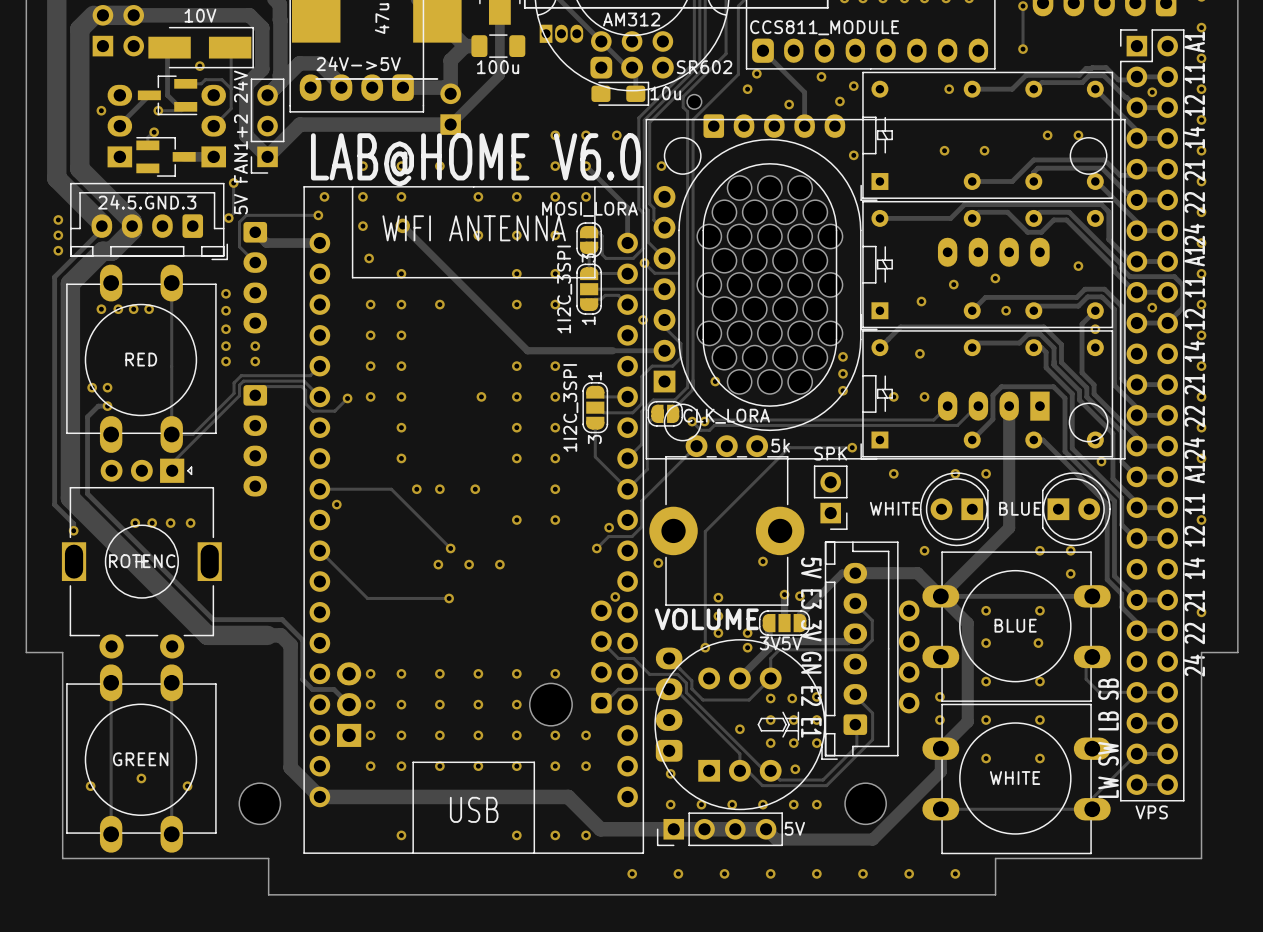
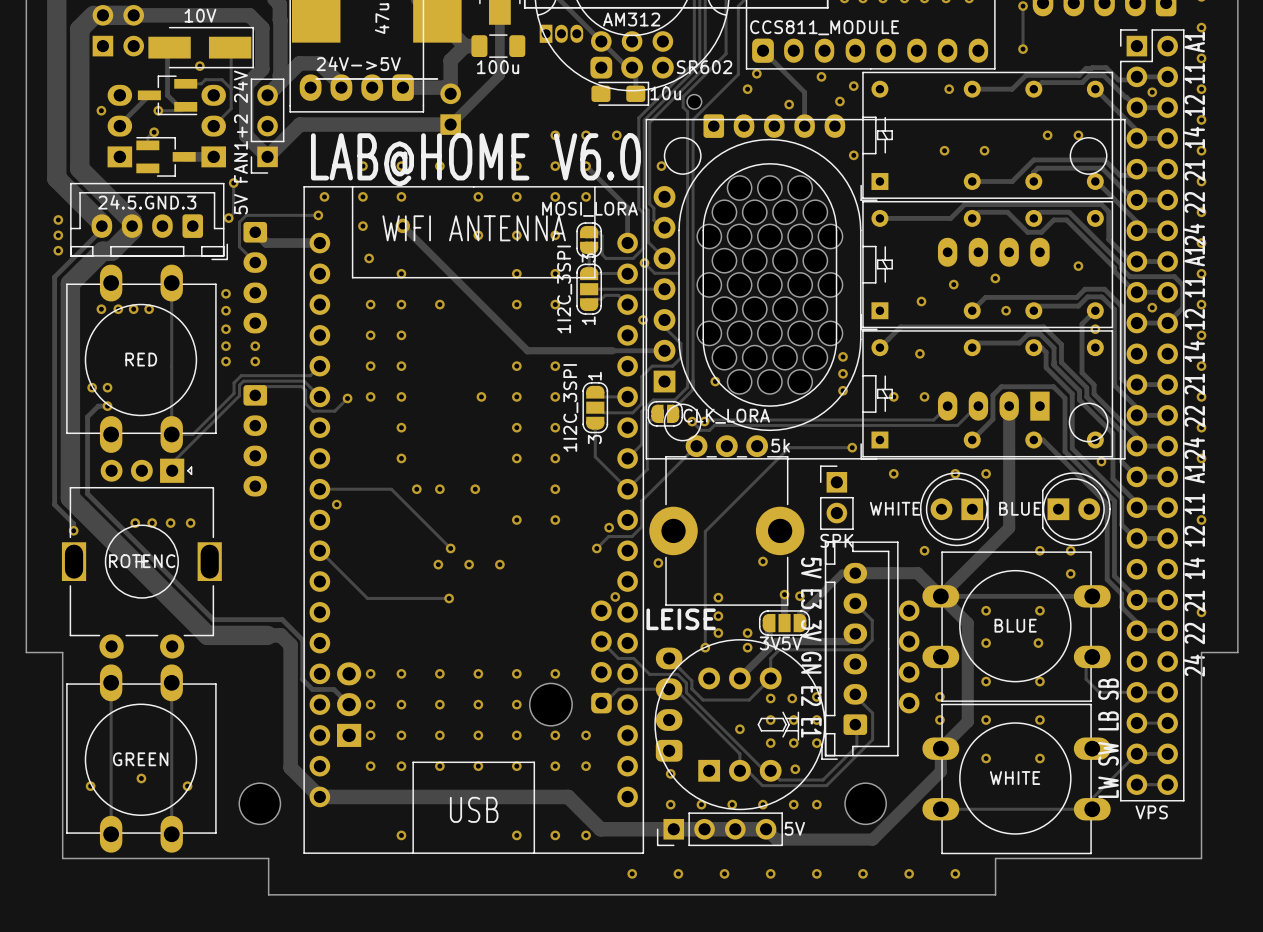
part rotation: 0° (830, 497) -> 180° (836, 497)
text: none -> LEISE (681, 619)
text: VOLUME (706, 619) -> none

